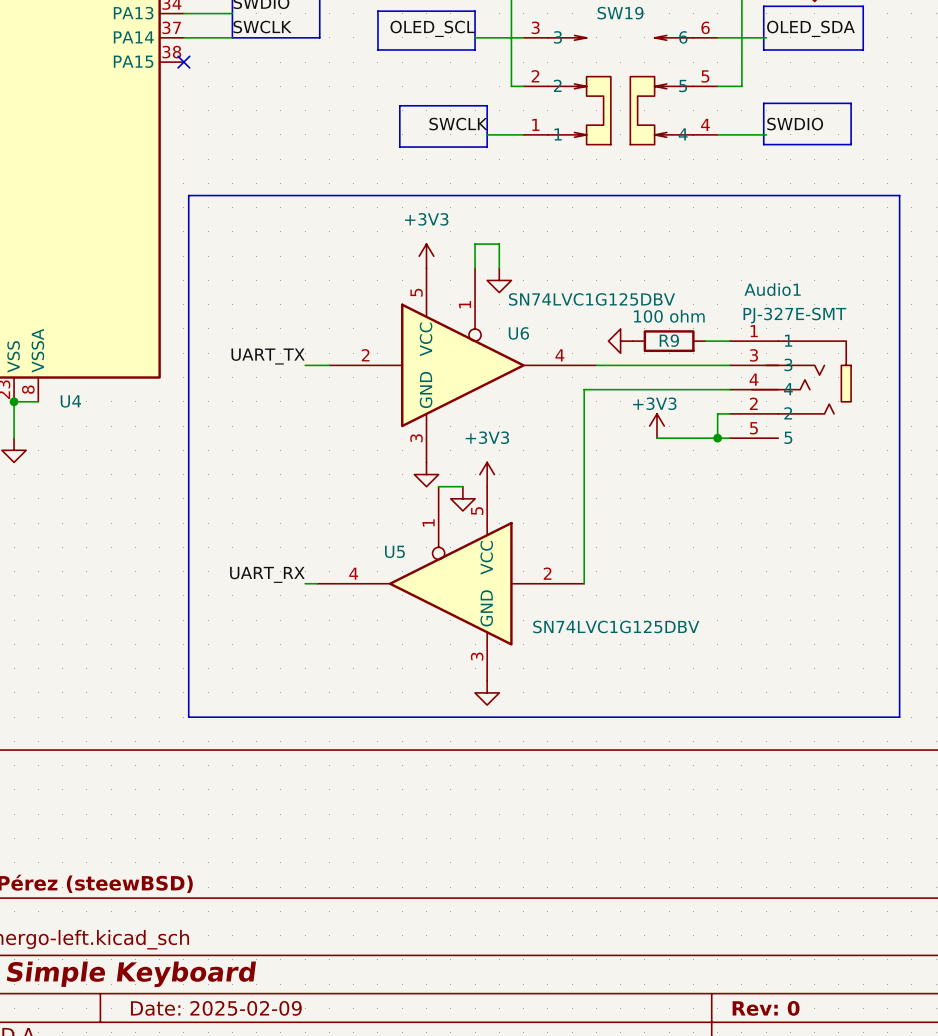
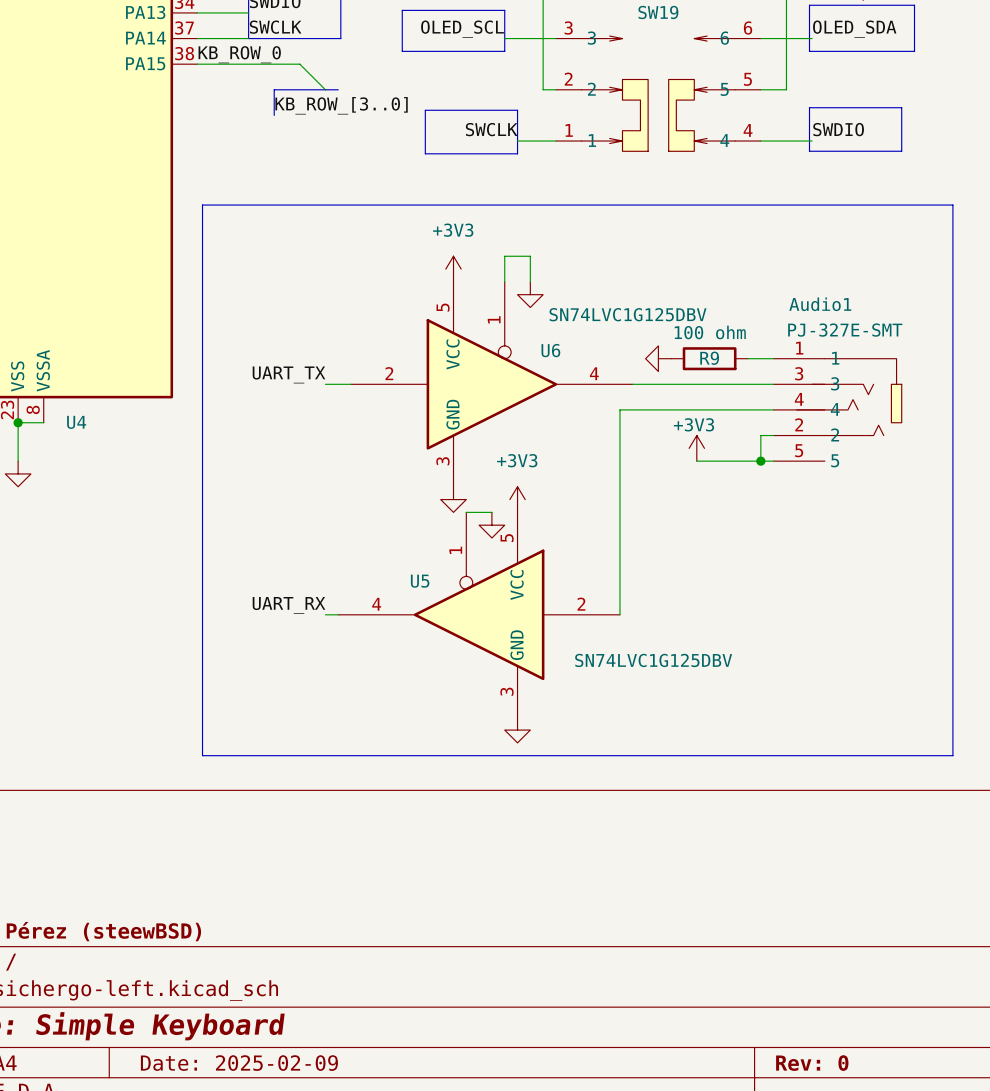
label: none -> KB_ROW_0 (239, 54)
wire: none -> (197, 64) (299, 64) (325, 89)
no-connect mark: (183, 62) -> none
bus: none -> (338, 89) (274, 89) (274, 115)
label: none -> KB_ROW_[3..0] (341, 105)

